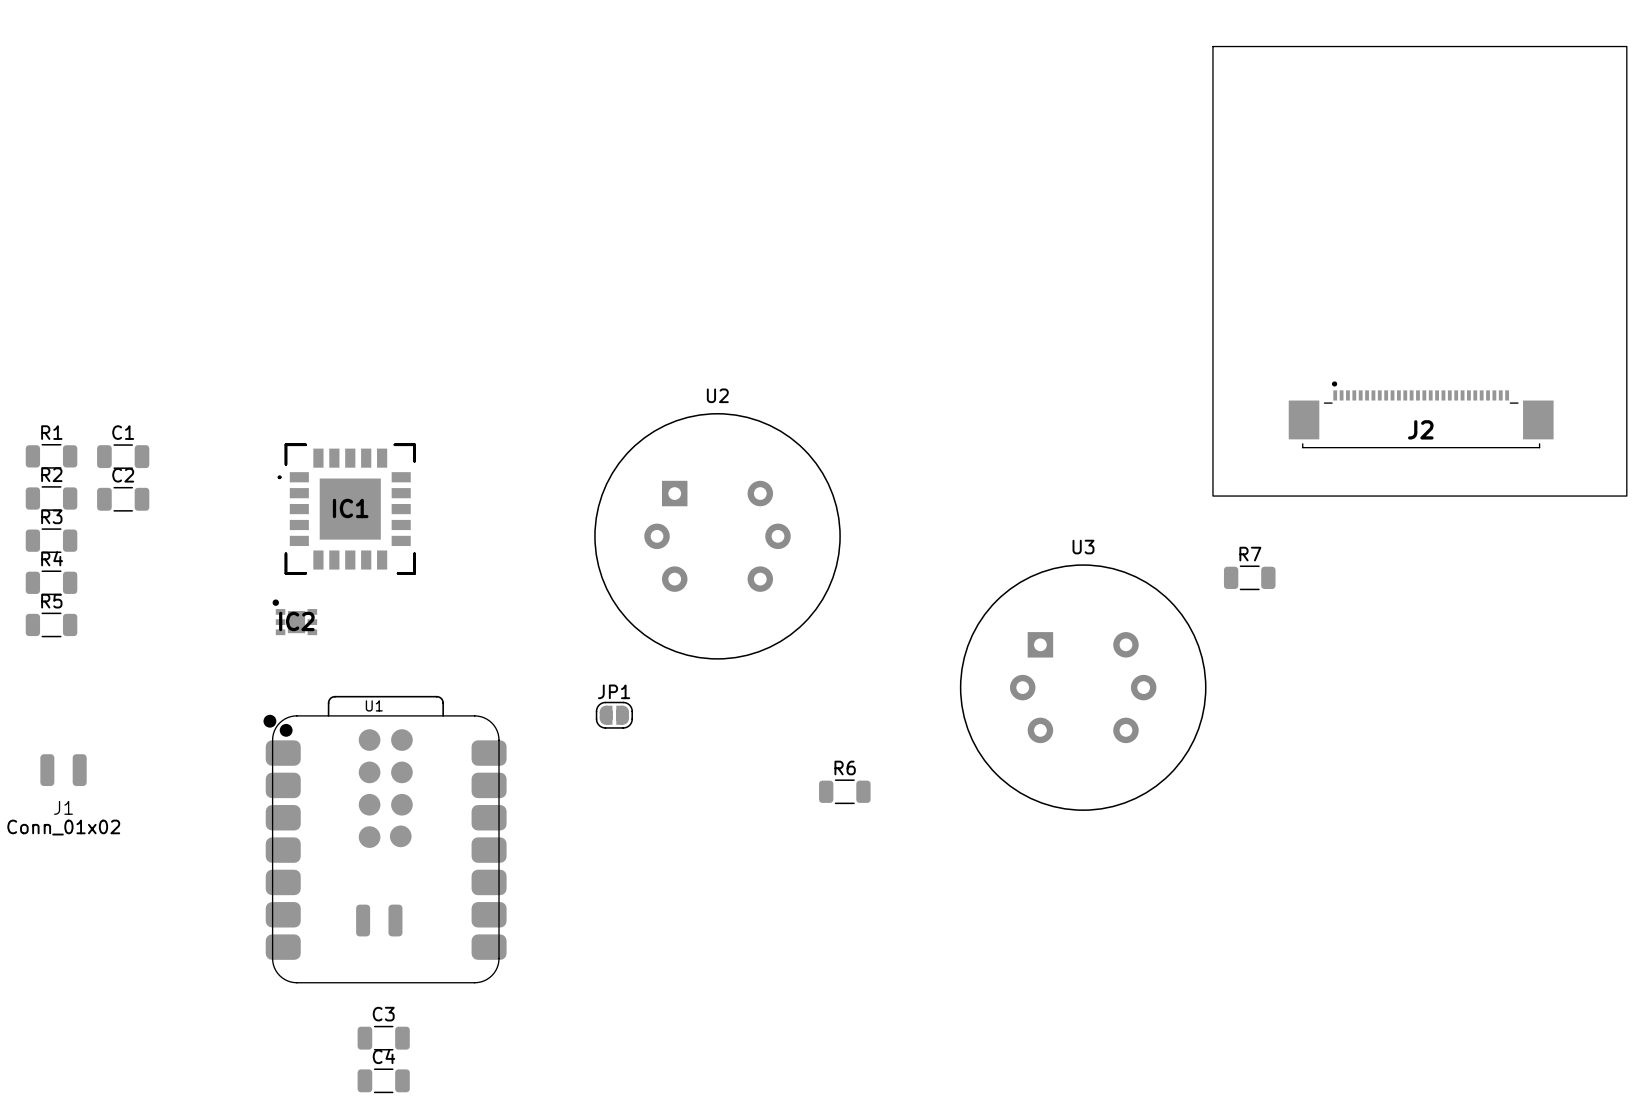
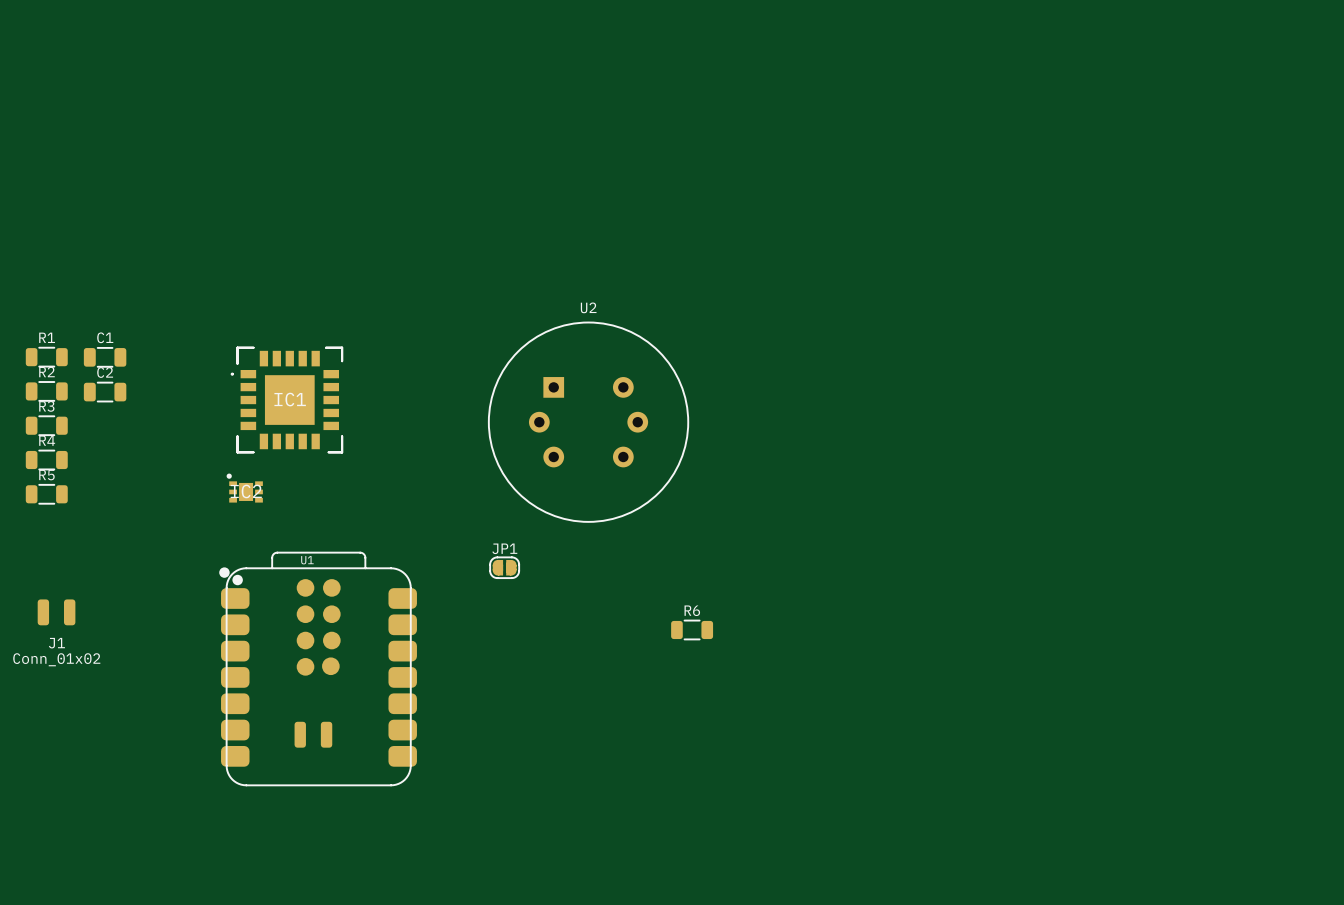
J2: (1419, 271) -> none
R7: (1249, 577) -> none
U3: (1083, 687) -> none
C3: (383, 1038) -> none
C4: (383, 1080) -> none

